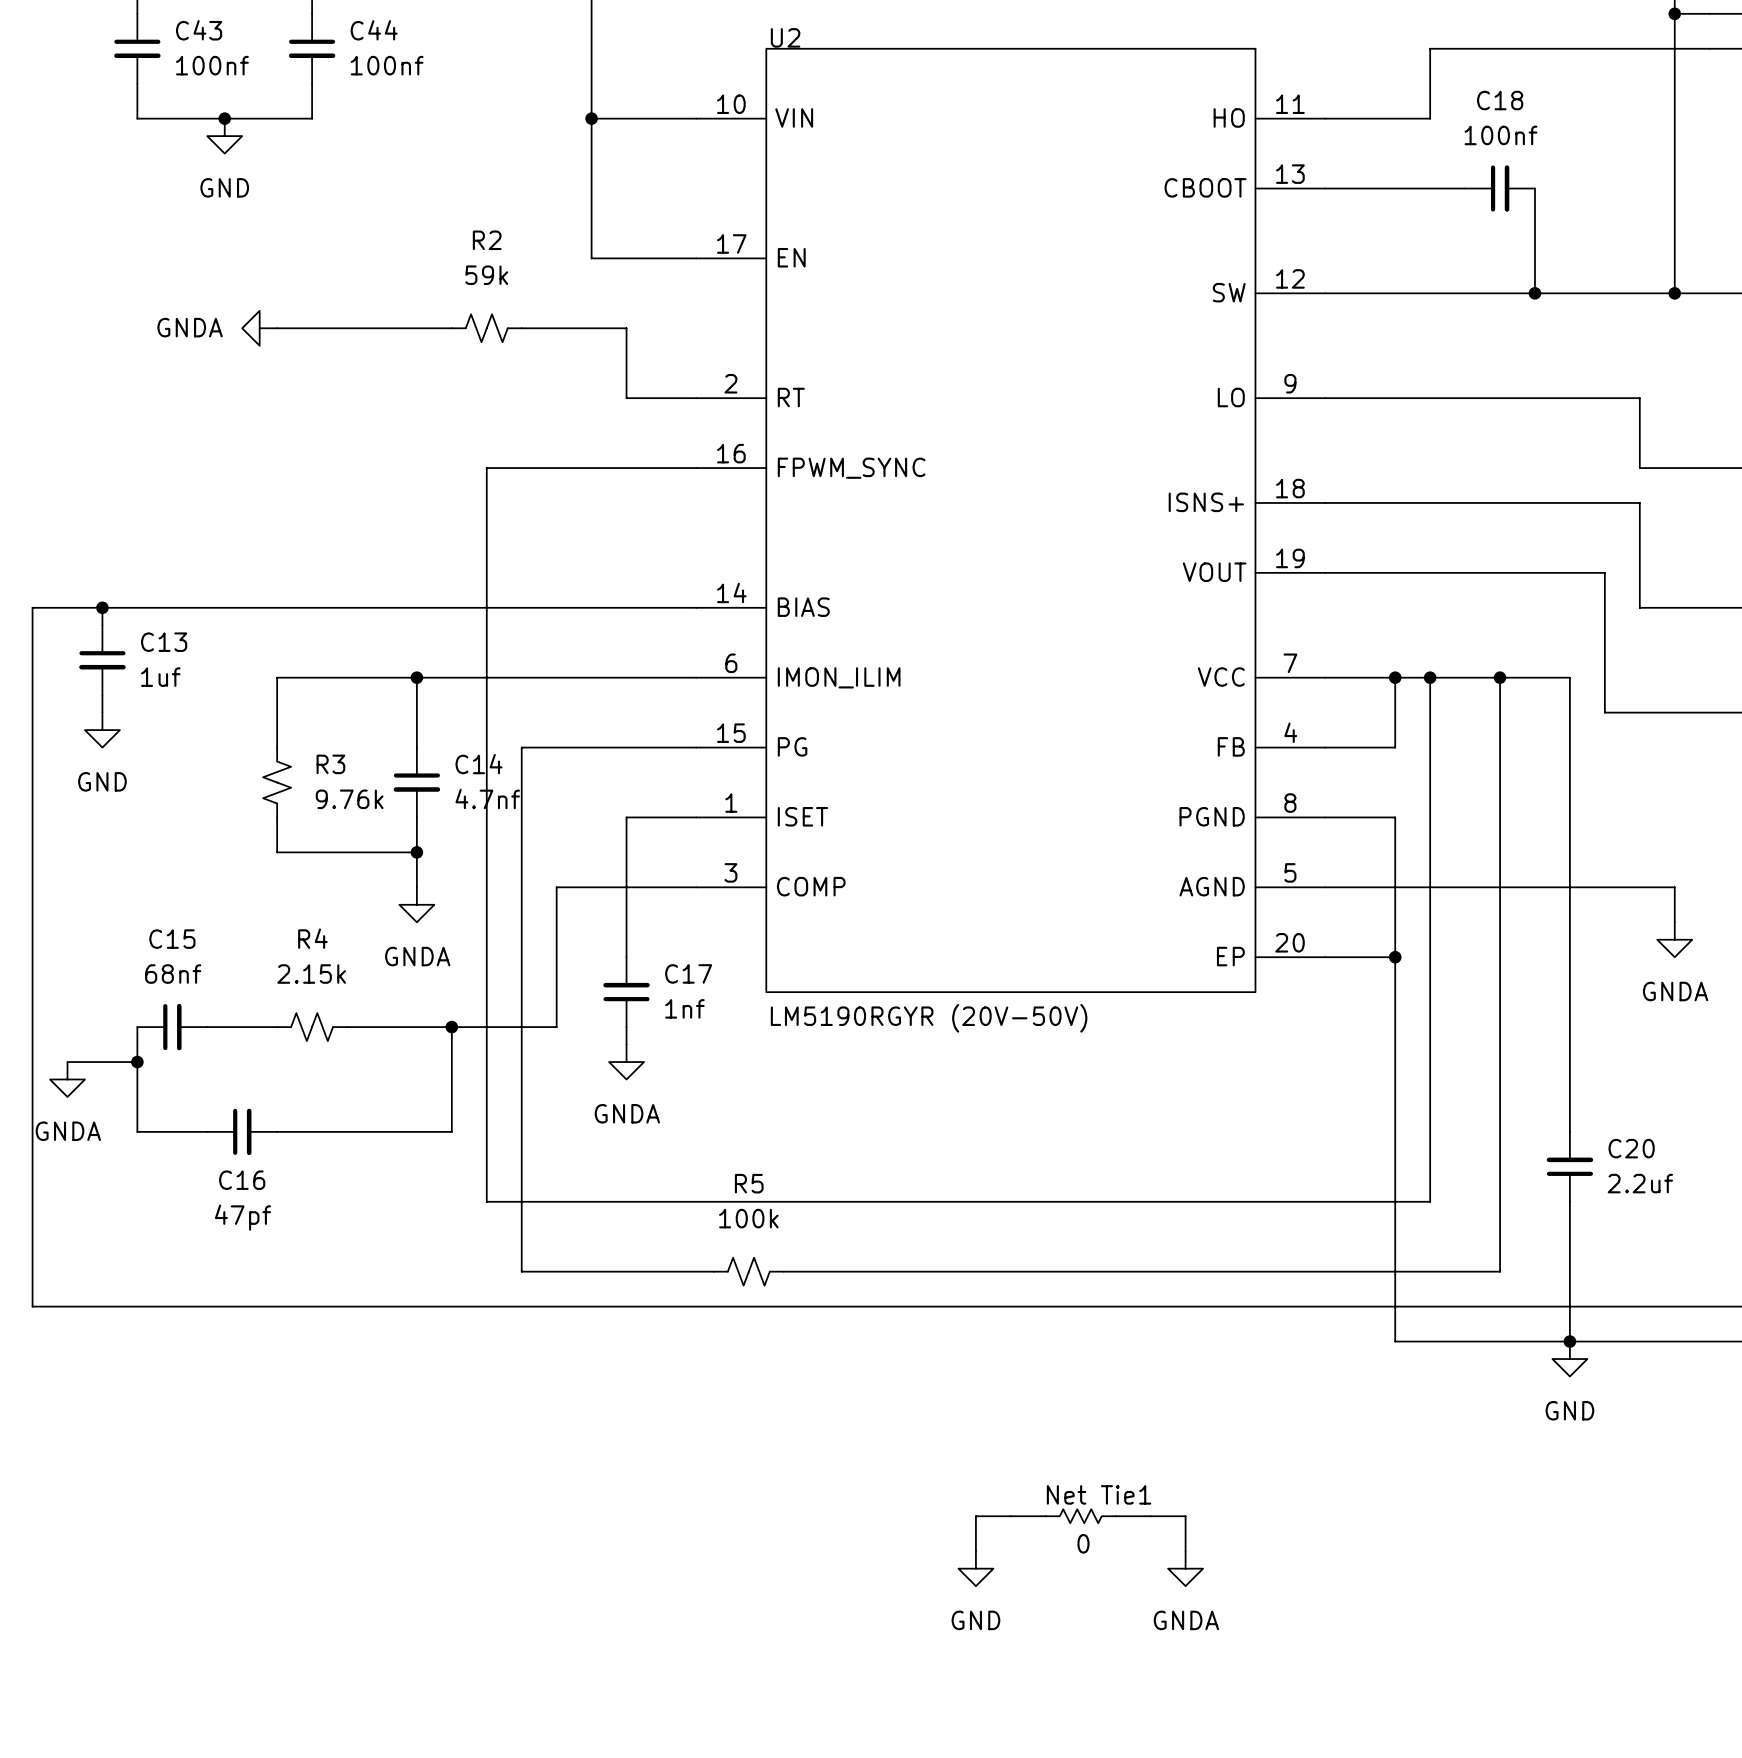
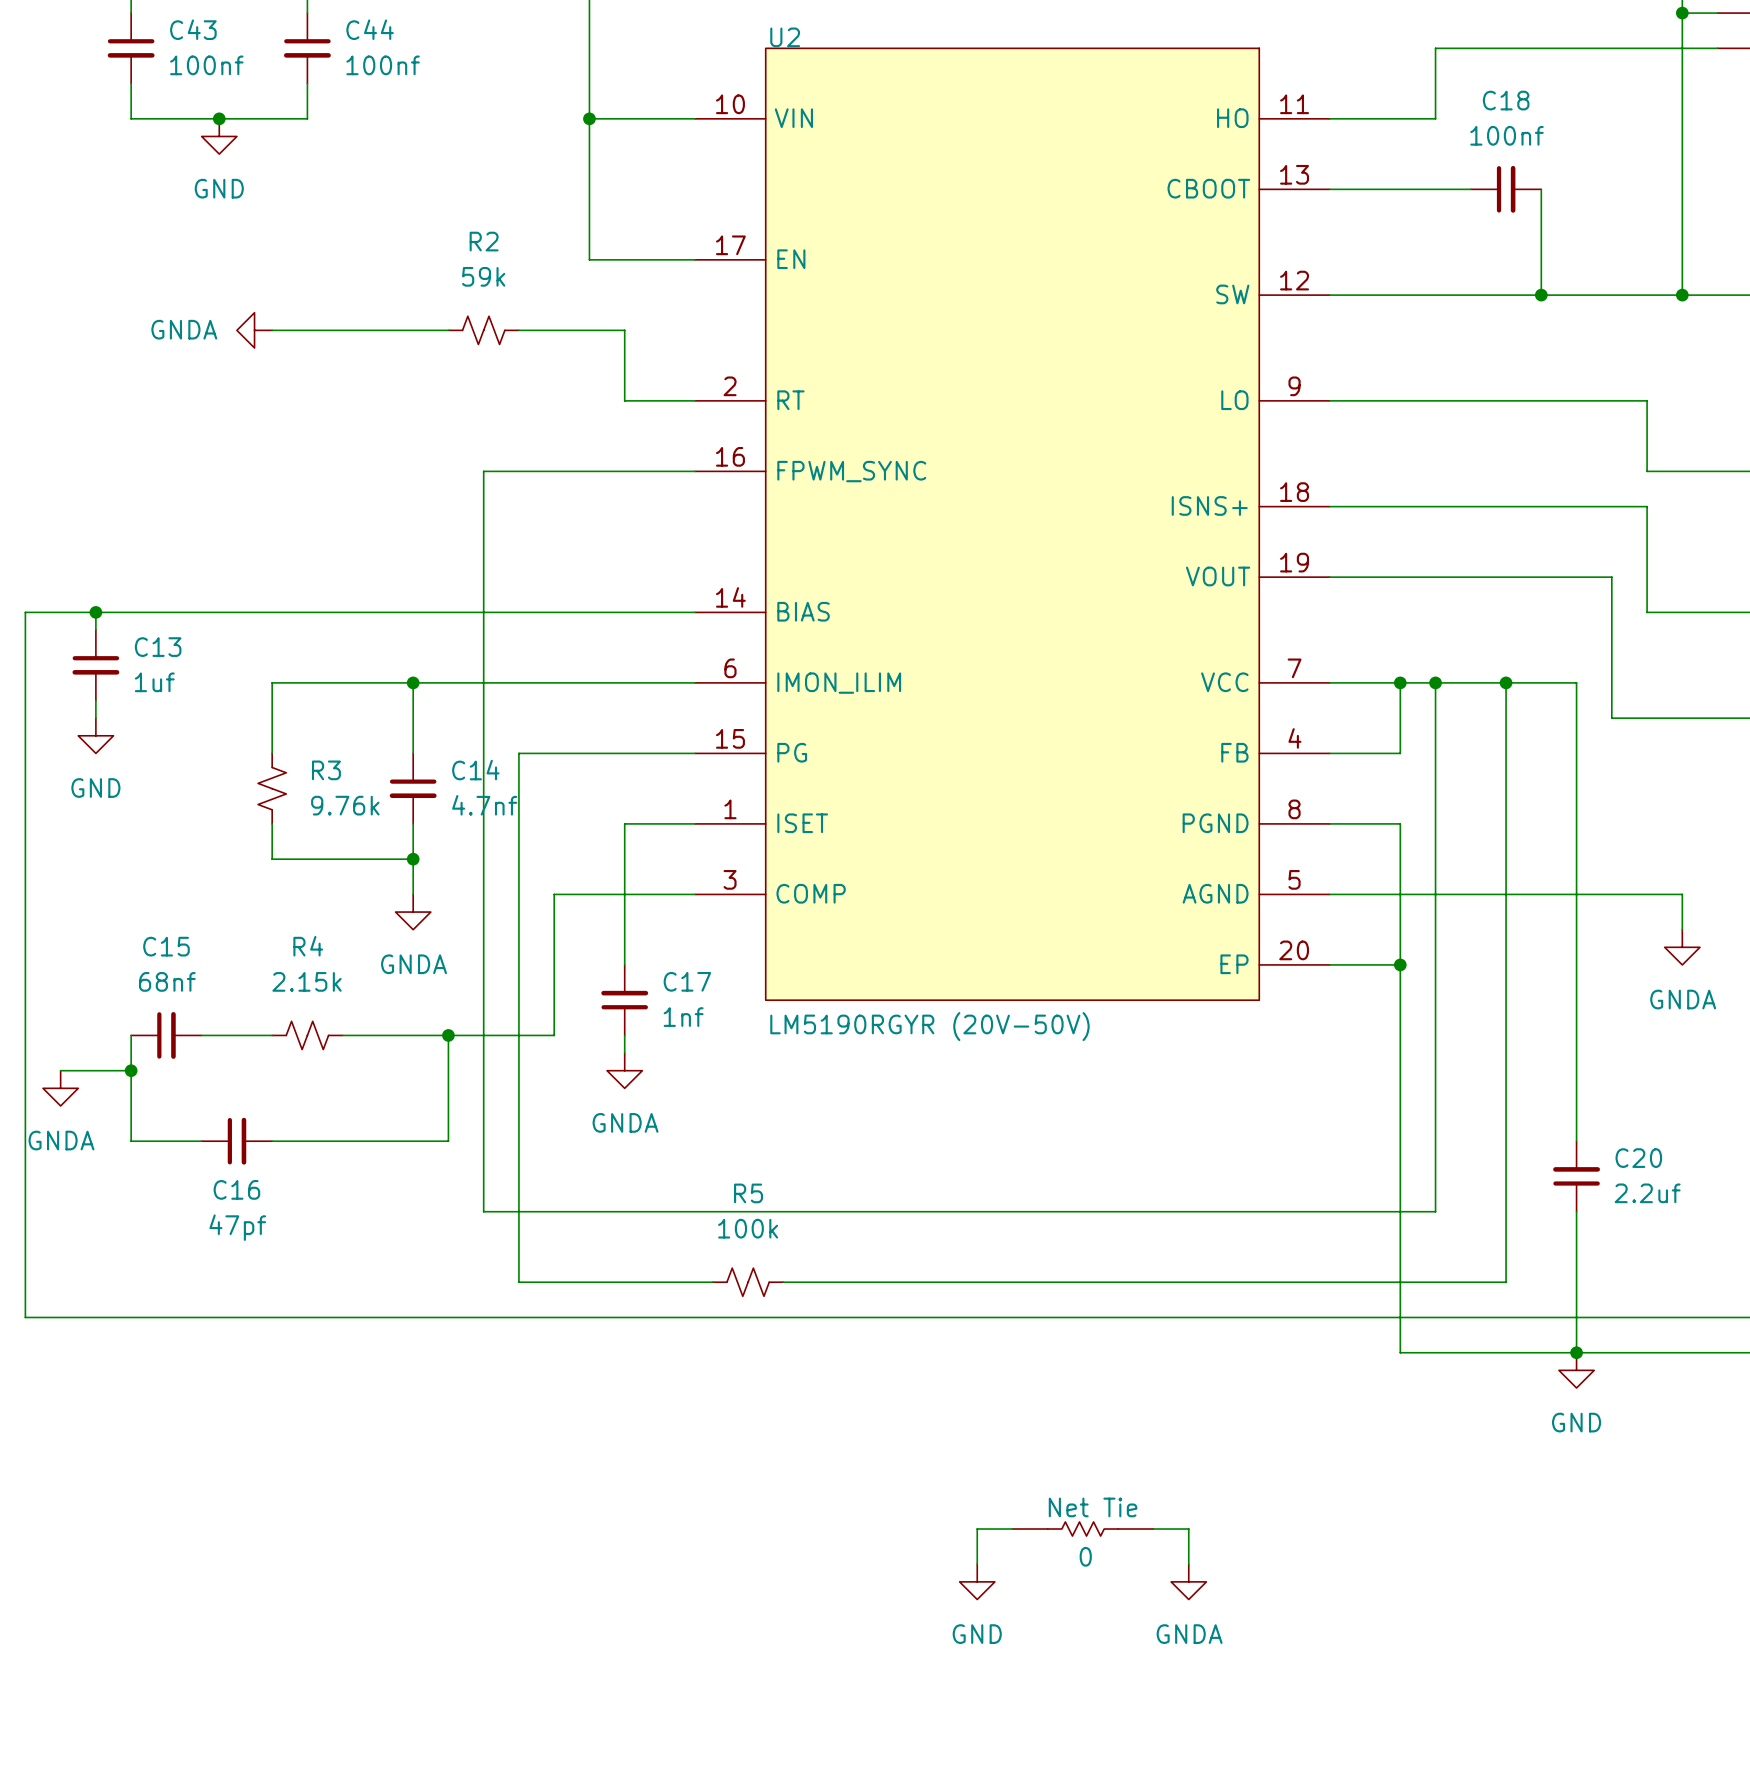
Net Tie1 name: Net Tie1 (1099, 1494) -> Net Tie (1093, 1507)

